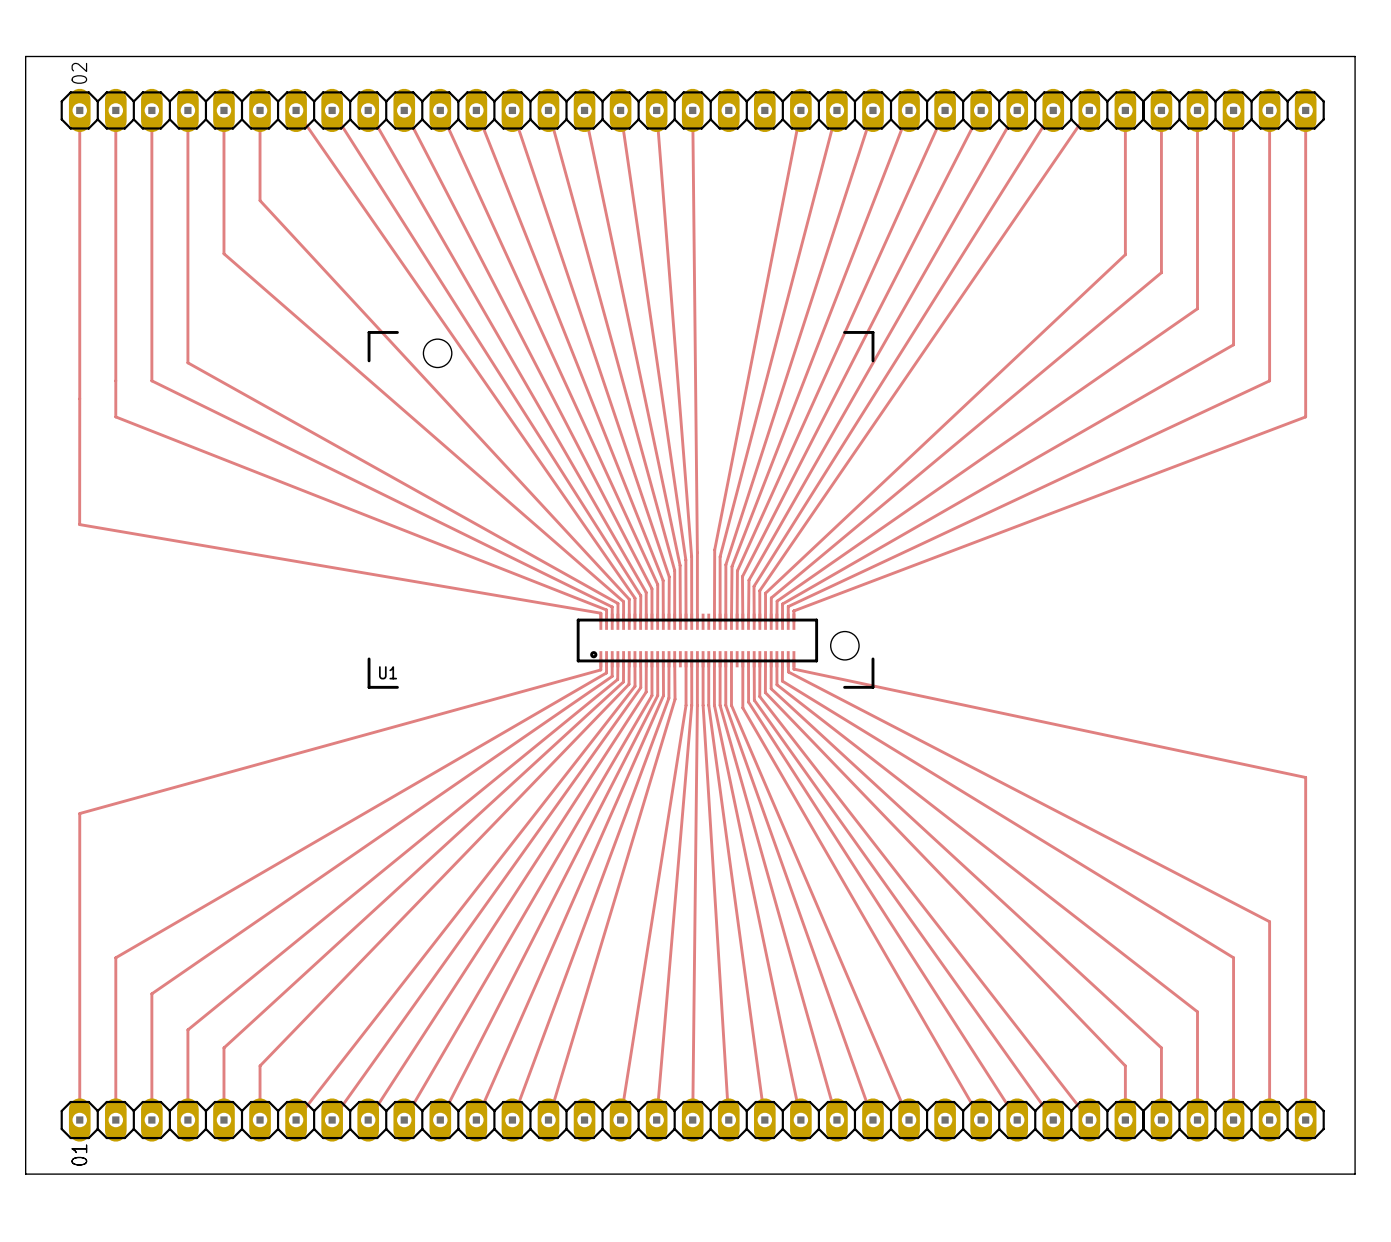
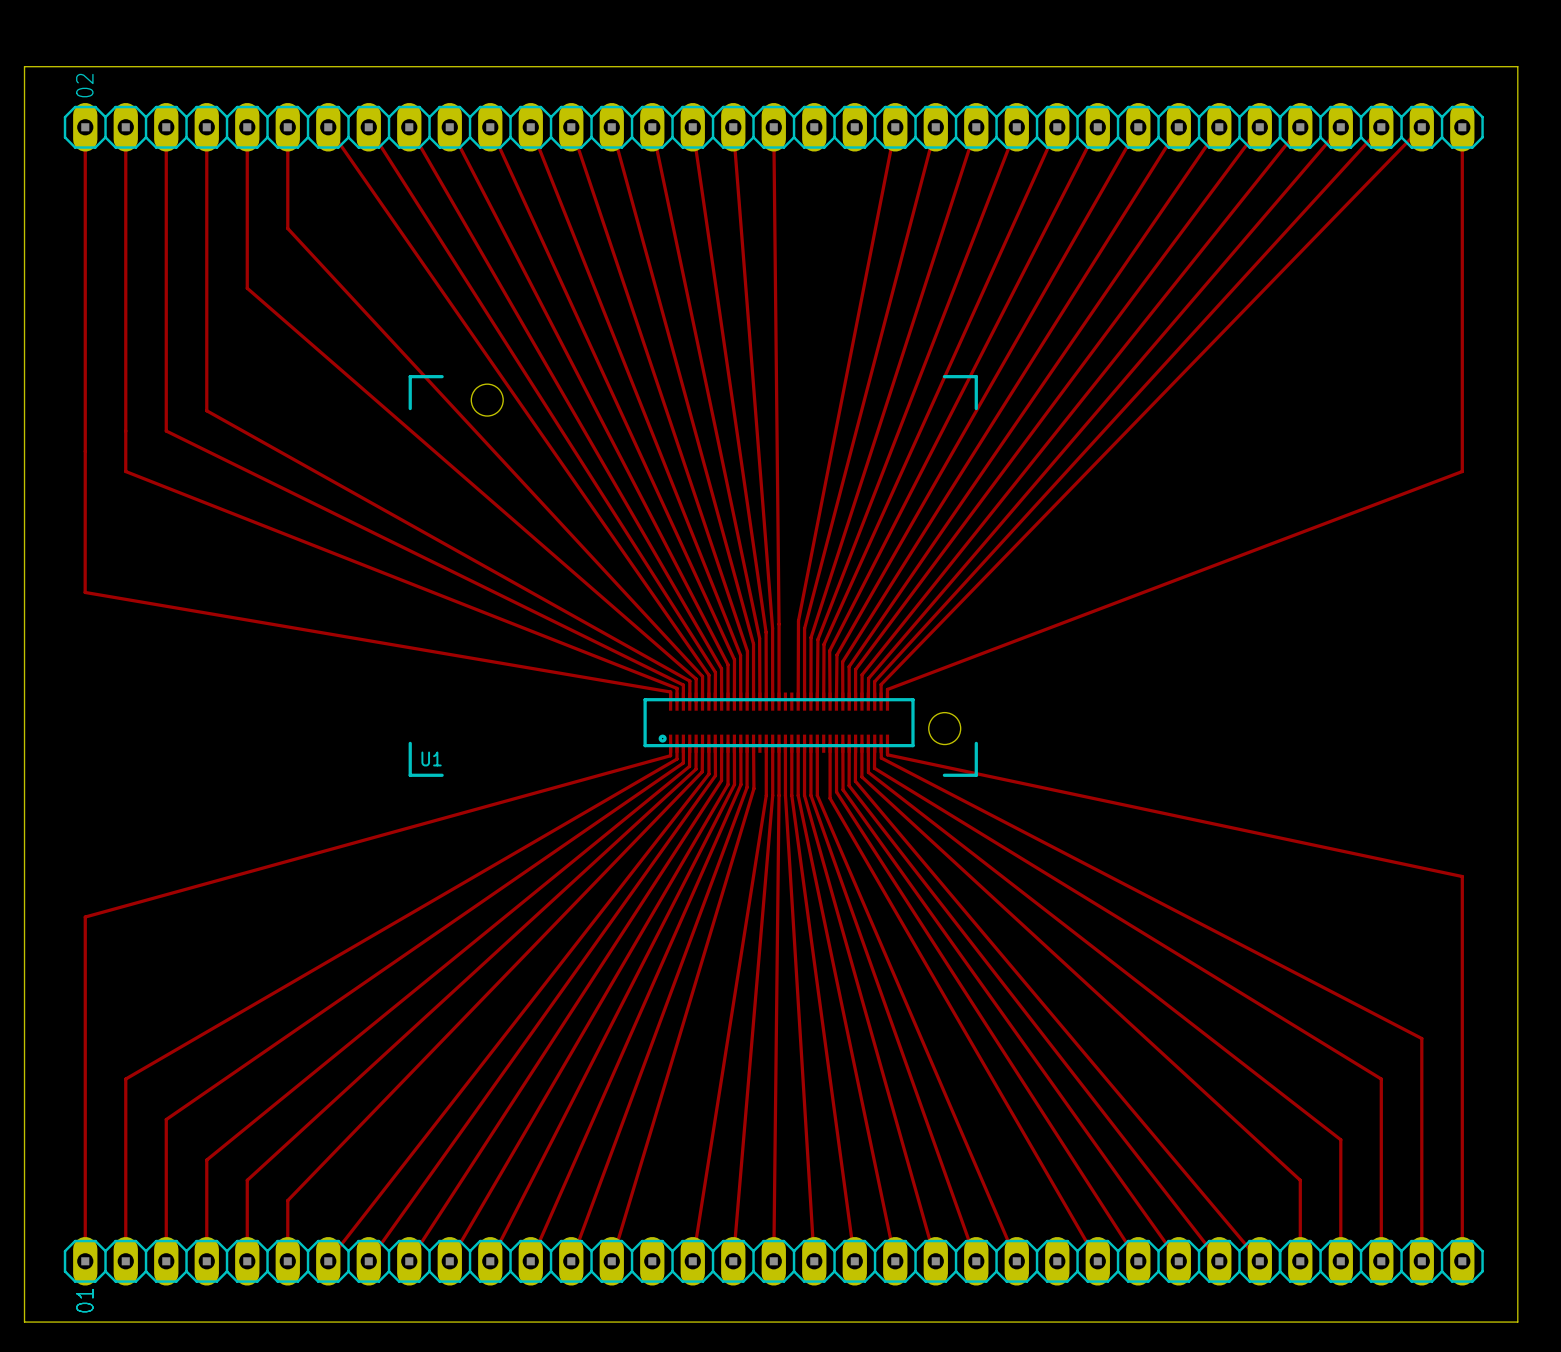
track: (1125, 110) (1125, 254) (765, 593) -> (1259, 127) (855, 669)
track: (1161, 110) (1161, 272) (771, 597) -> (1300, 127) (862, 674)
track: (1197, 110) (1197, 308) (777, 601) -> (1340, 127) (868, 678)
track: (1233, 110) (1233, 344) (782, 604) -> (1381, 127) (874, 681)
track: (1269, 110) (1269, 380) (788, 606) -> (1421, 127) (881, 684)
track: (765, 692) (1125, 1065) (1125, 1120) -> (855, 781) (1259, 1261)

